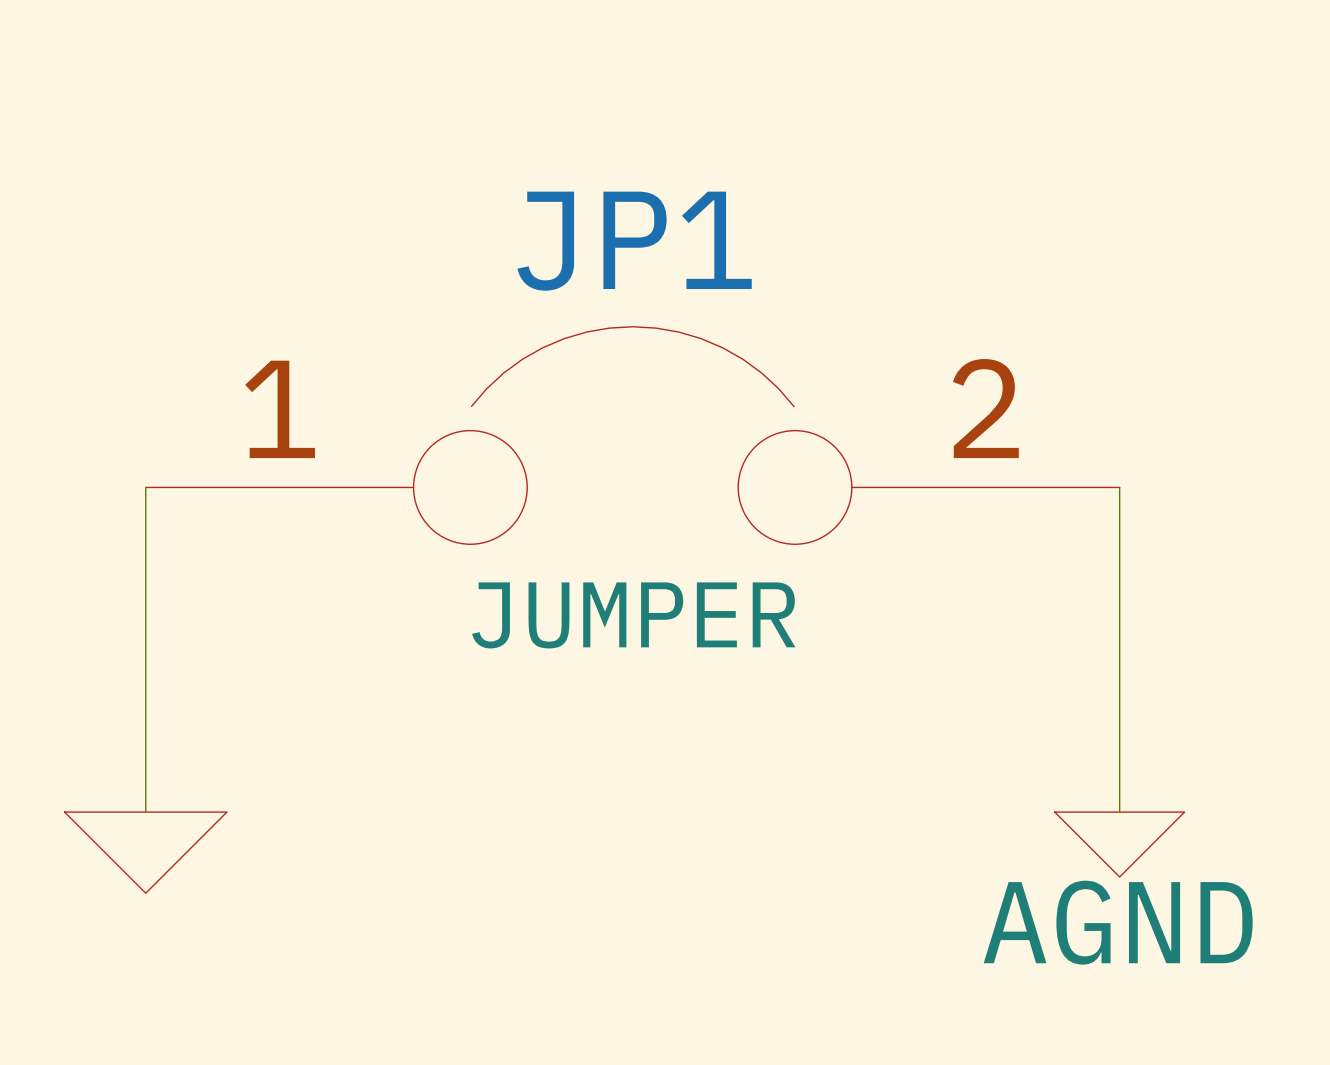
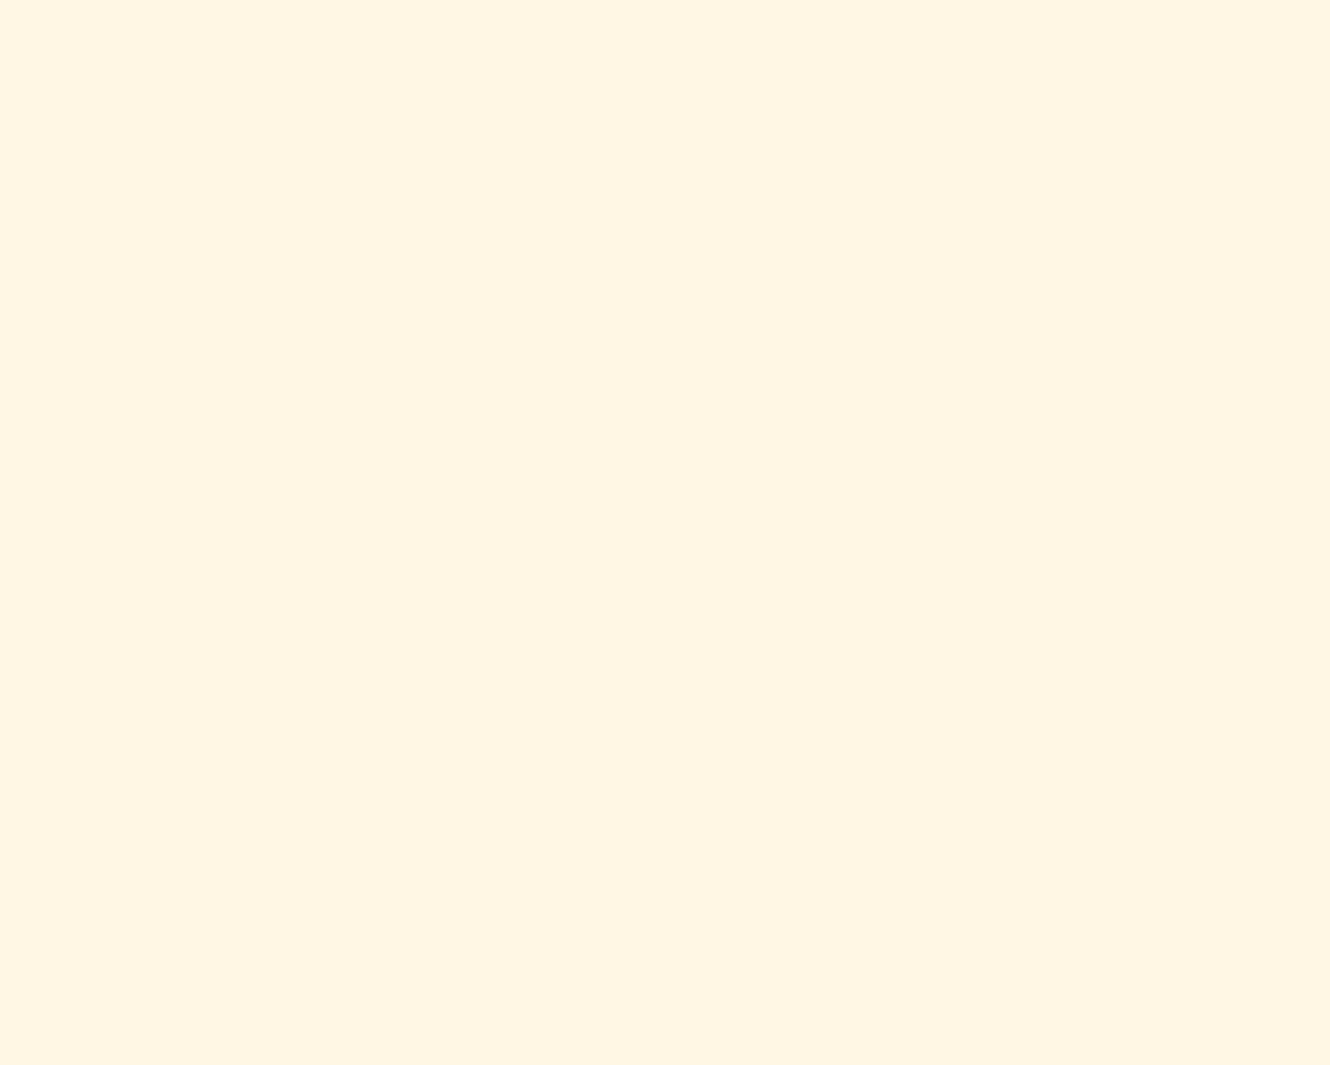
JP1: JUMPER (632, 435) -> none
wire: (145, 487) (145, 812) -> none
wire: (1119, 487) (1119, 812) -> none
power symbol: AGND (1119, 844) -> none
power symbol: (145, 852) -> none

